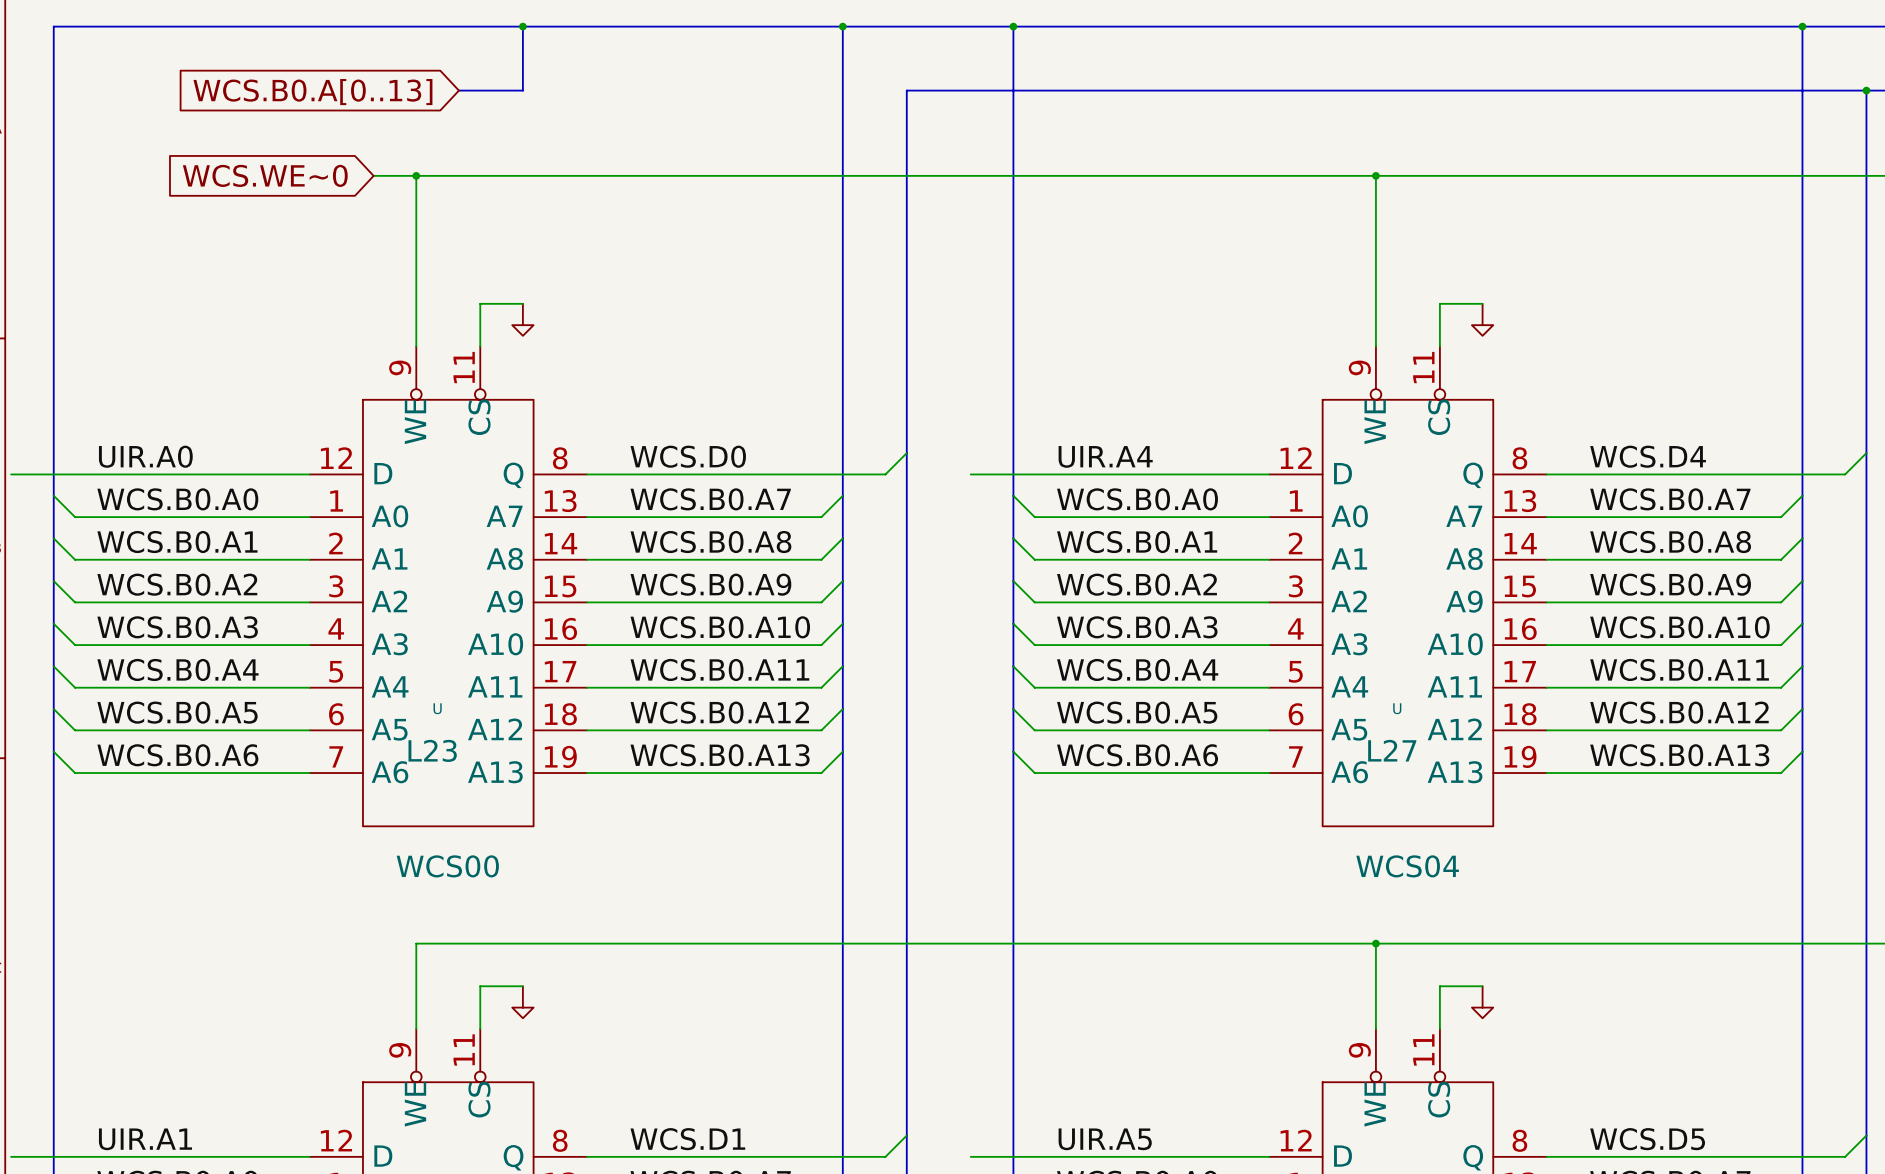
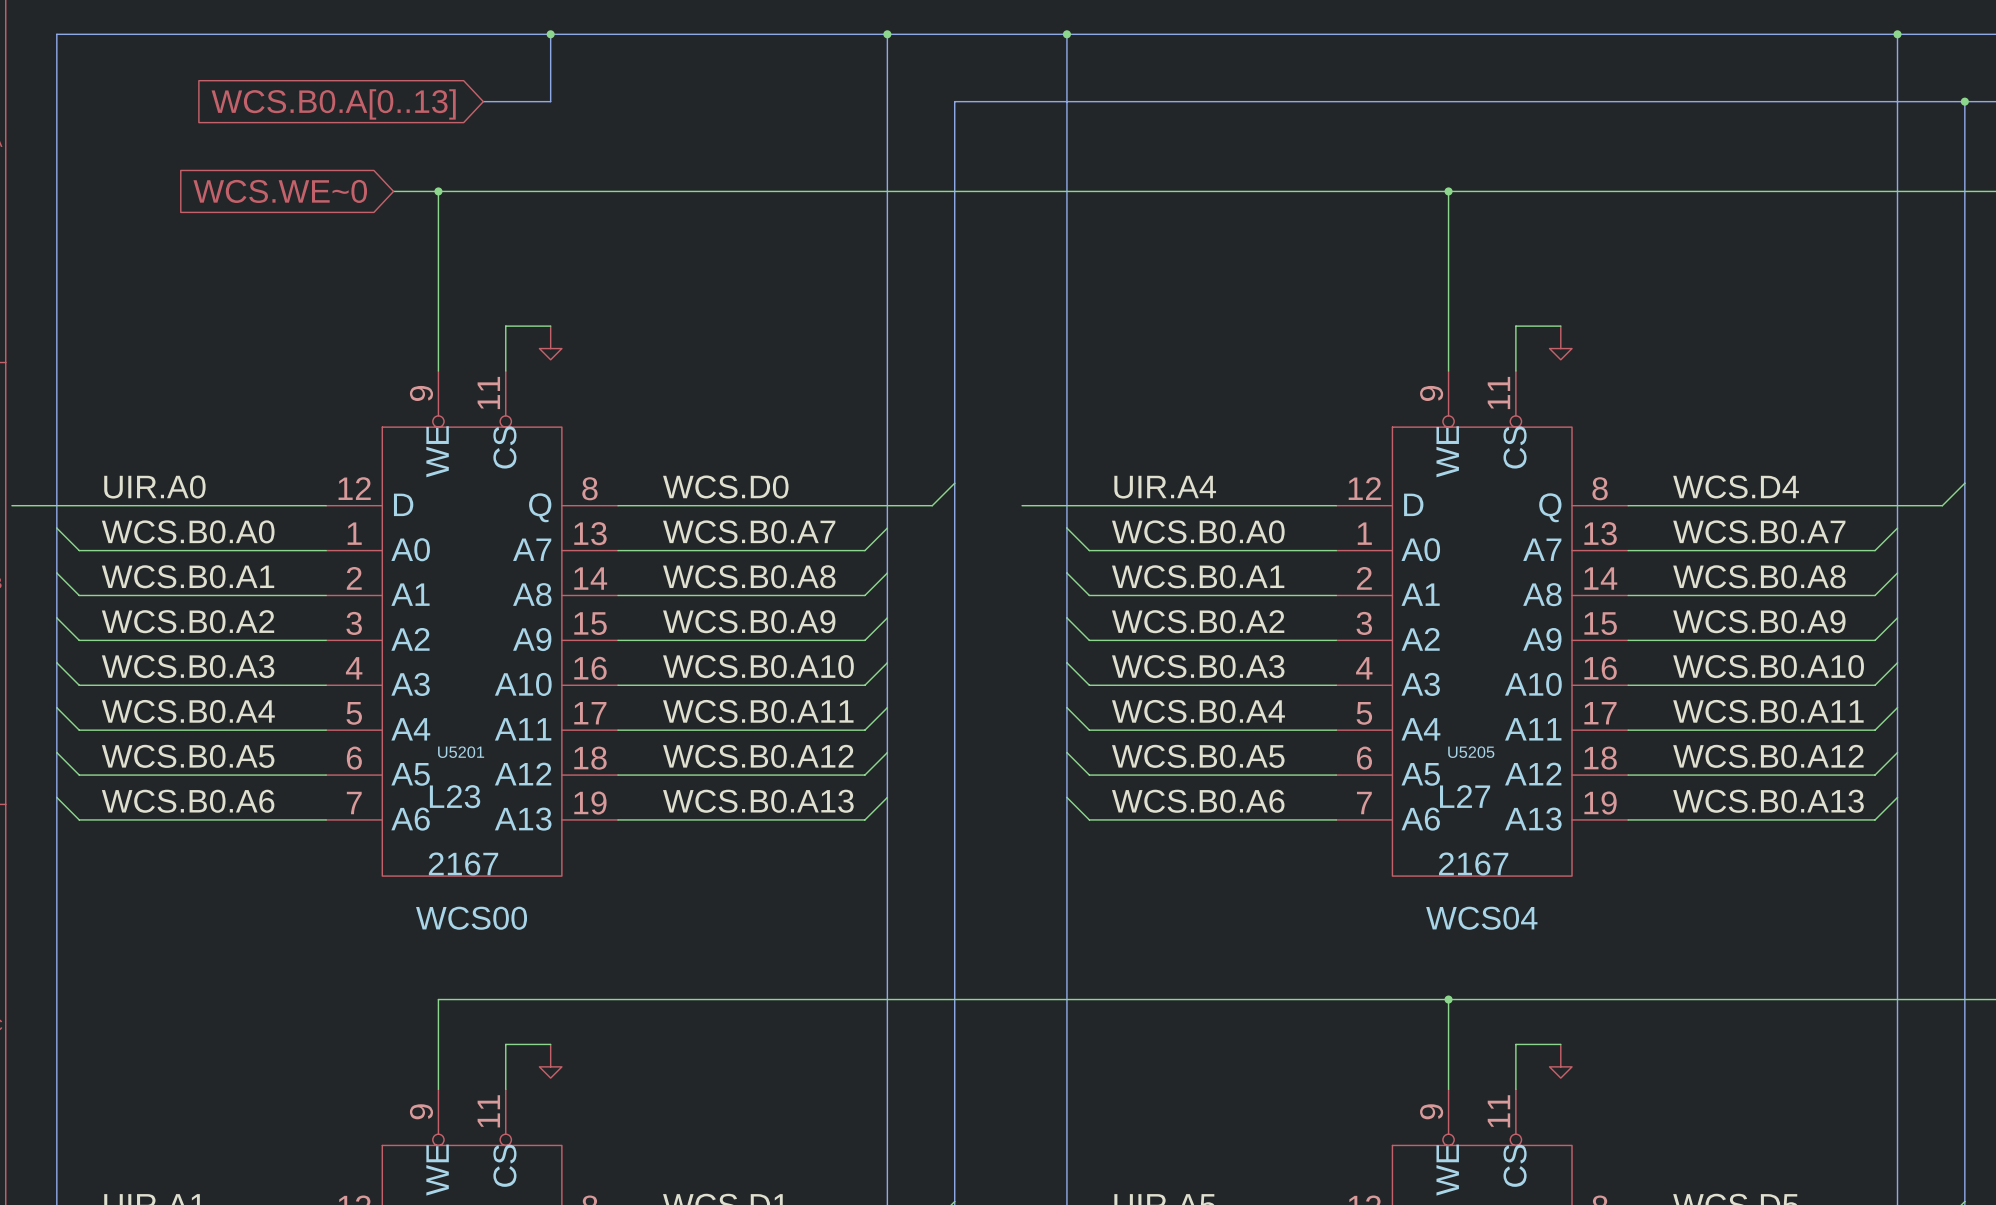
U name: U (437, 708) -> U5201 (461, 752)
U name: U (1397, 708) -> U5205 (1471, 752)
U value: none -> 2167 (463, 864)
U value: none -> 2167 (1473, 864)

